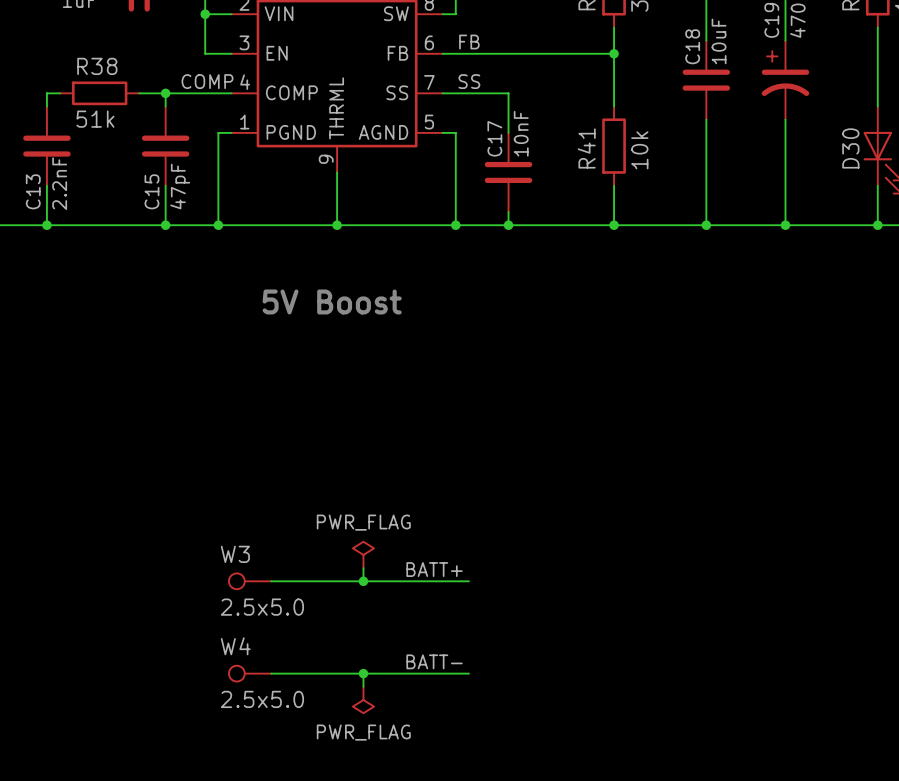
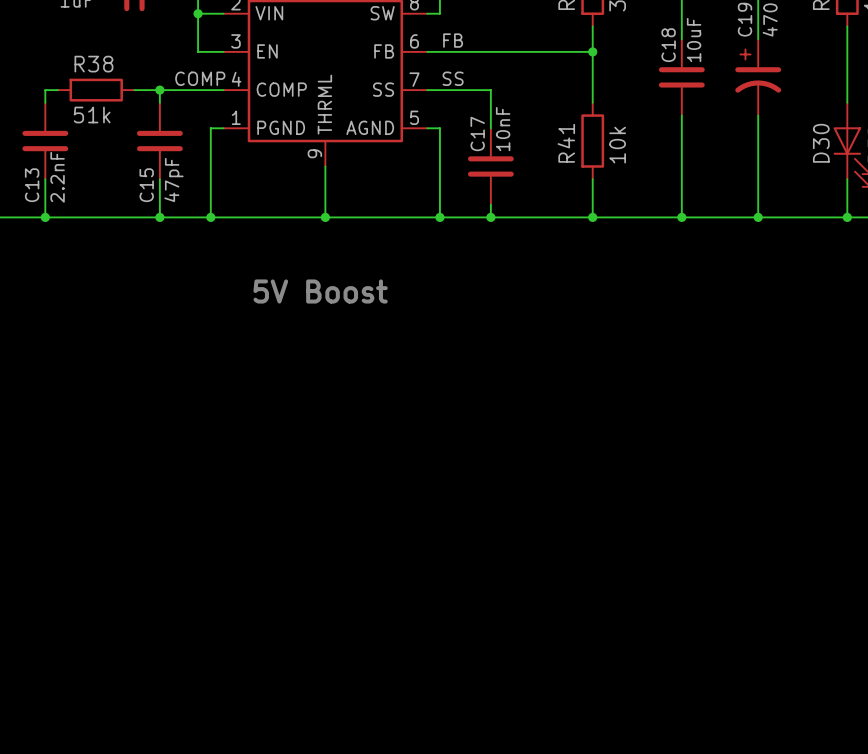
power symbol: PWR_FLAG (363, 554) -> none
wire: (363, 568) (363, 581) -> none
label: BATT+ (434, 569) -> none
W3: 2.5x5.0 (250, 581) -> none
wire: (271, 581) (468, 581) -> none
junction: (363, 581) -> none
label: BATT- (434, 661) -> none
W4: 2.5x5.0 (250, 673) -> none
wire: (271, 673) (468, 673) -> none
wire: (363, 673) (363, 686) -> none
junction: (363, 673) -> none
power symbol: PWR_FLAG (363, 700) -> none

